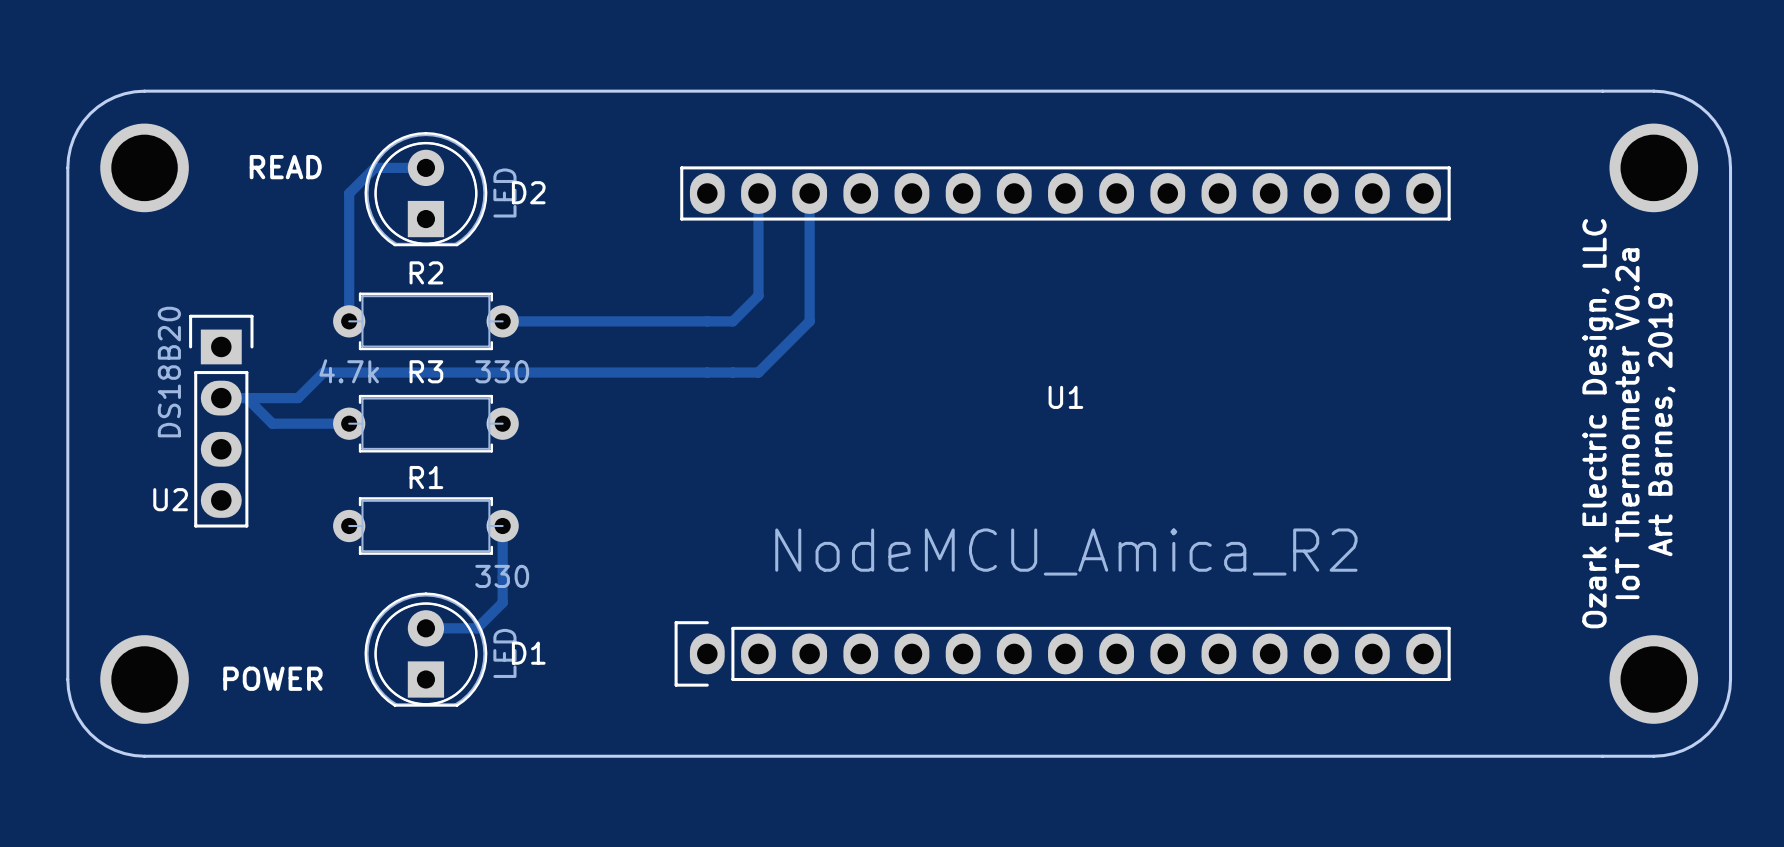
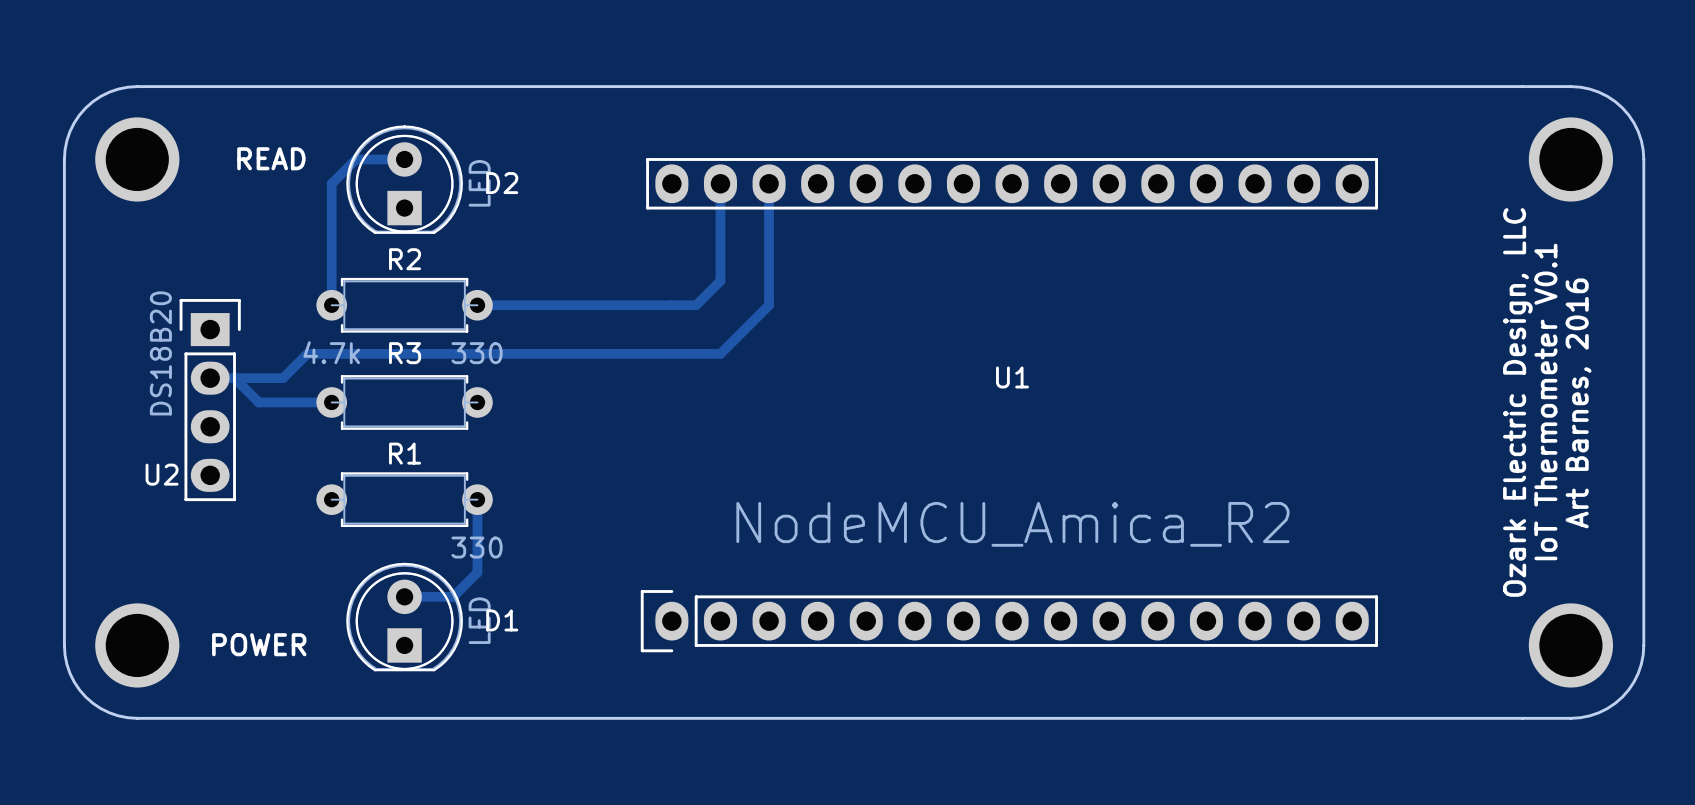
text: IoT Thermometer V0.2a (1627, 423) -> IoT Thermometer V0.1 (1545, 402)
text: Art Barnes, 2019 (1661, 424) -> Art Barnes, 2016 (1578, 403)

